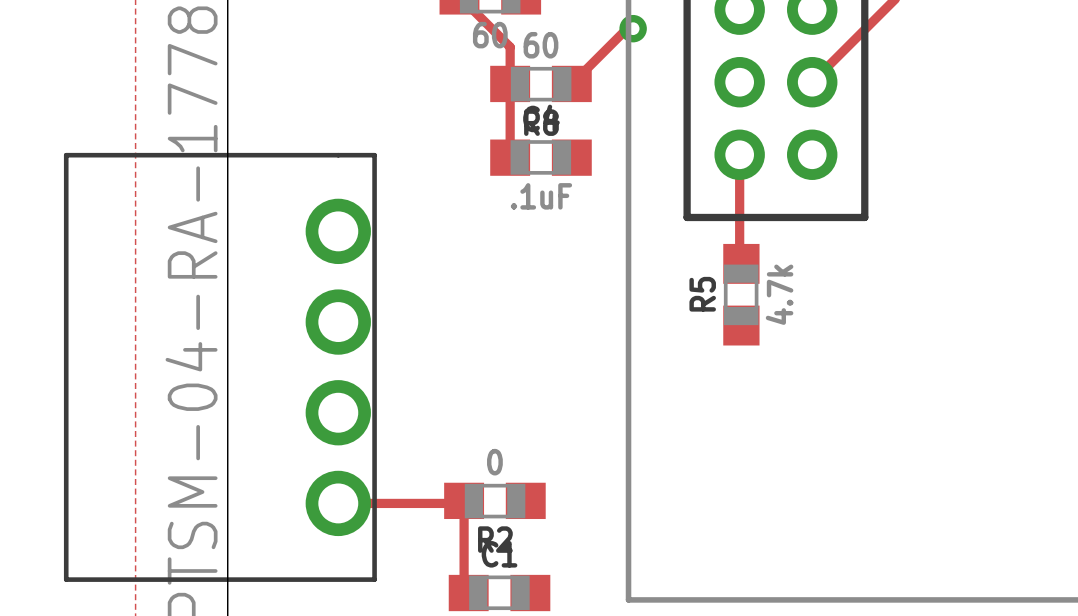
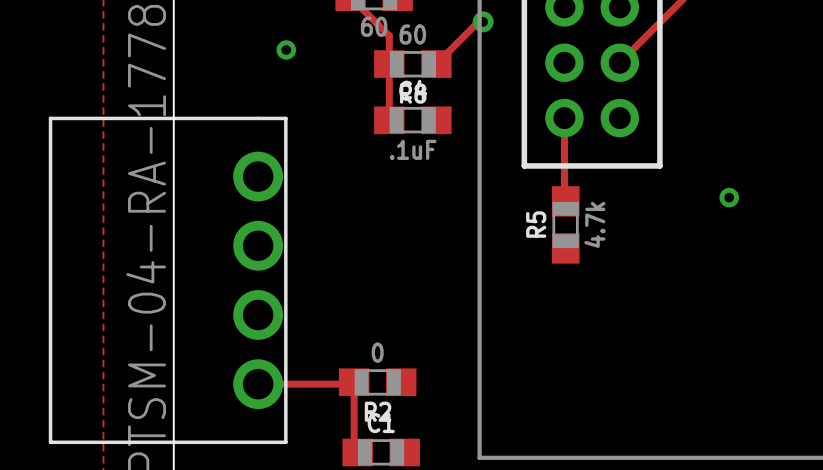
via: none -> (286, 50)
via: none -> (729, 197)

